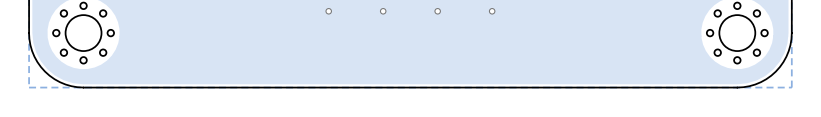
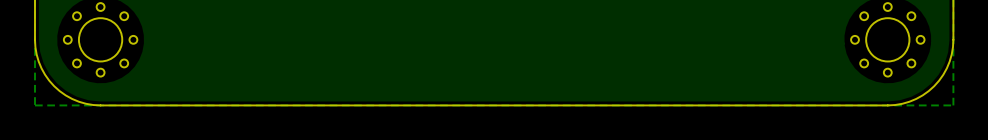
via: (328, 11) -> none
via: (383, 11) -> none
via: (437, 11) -> none
via: (492, 11) -> none

